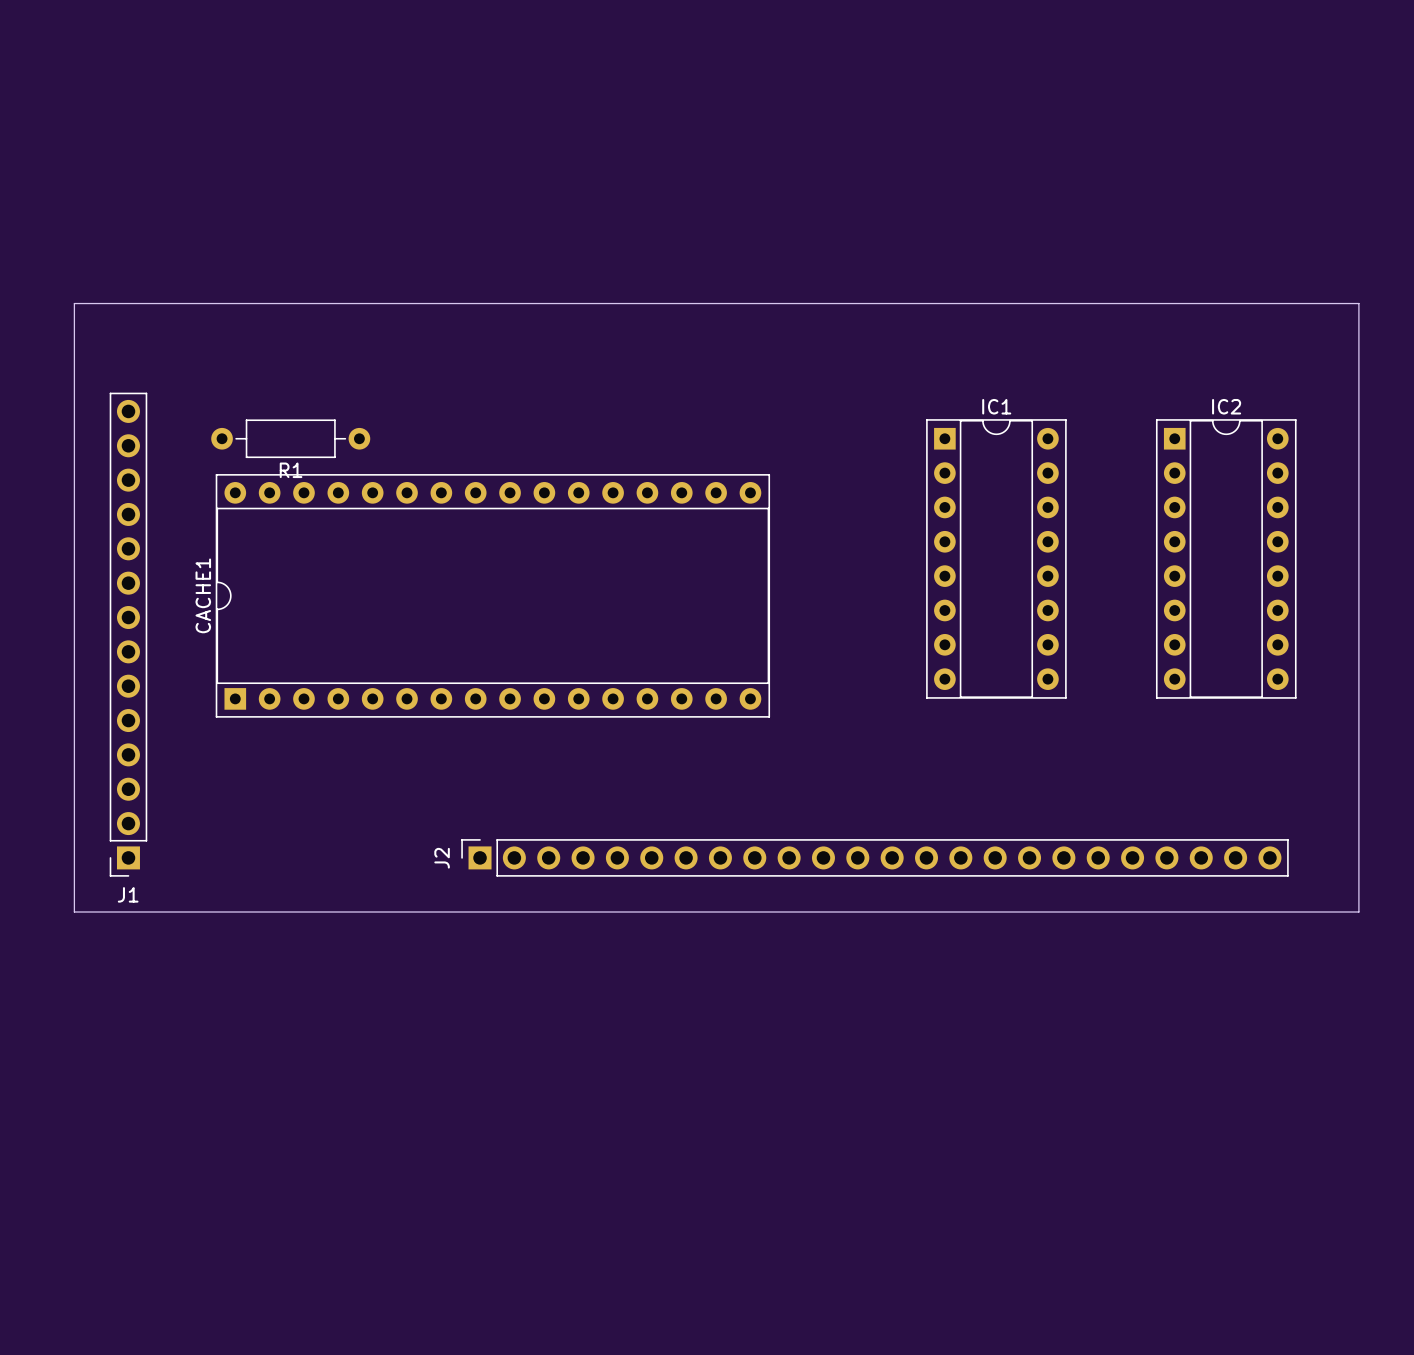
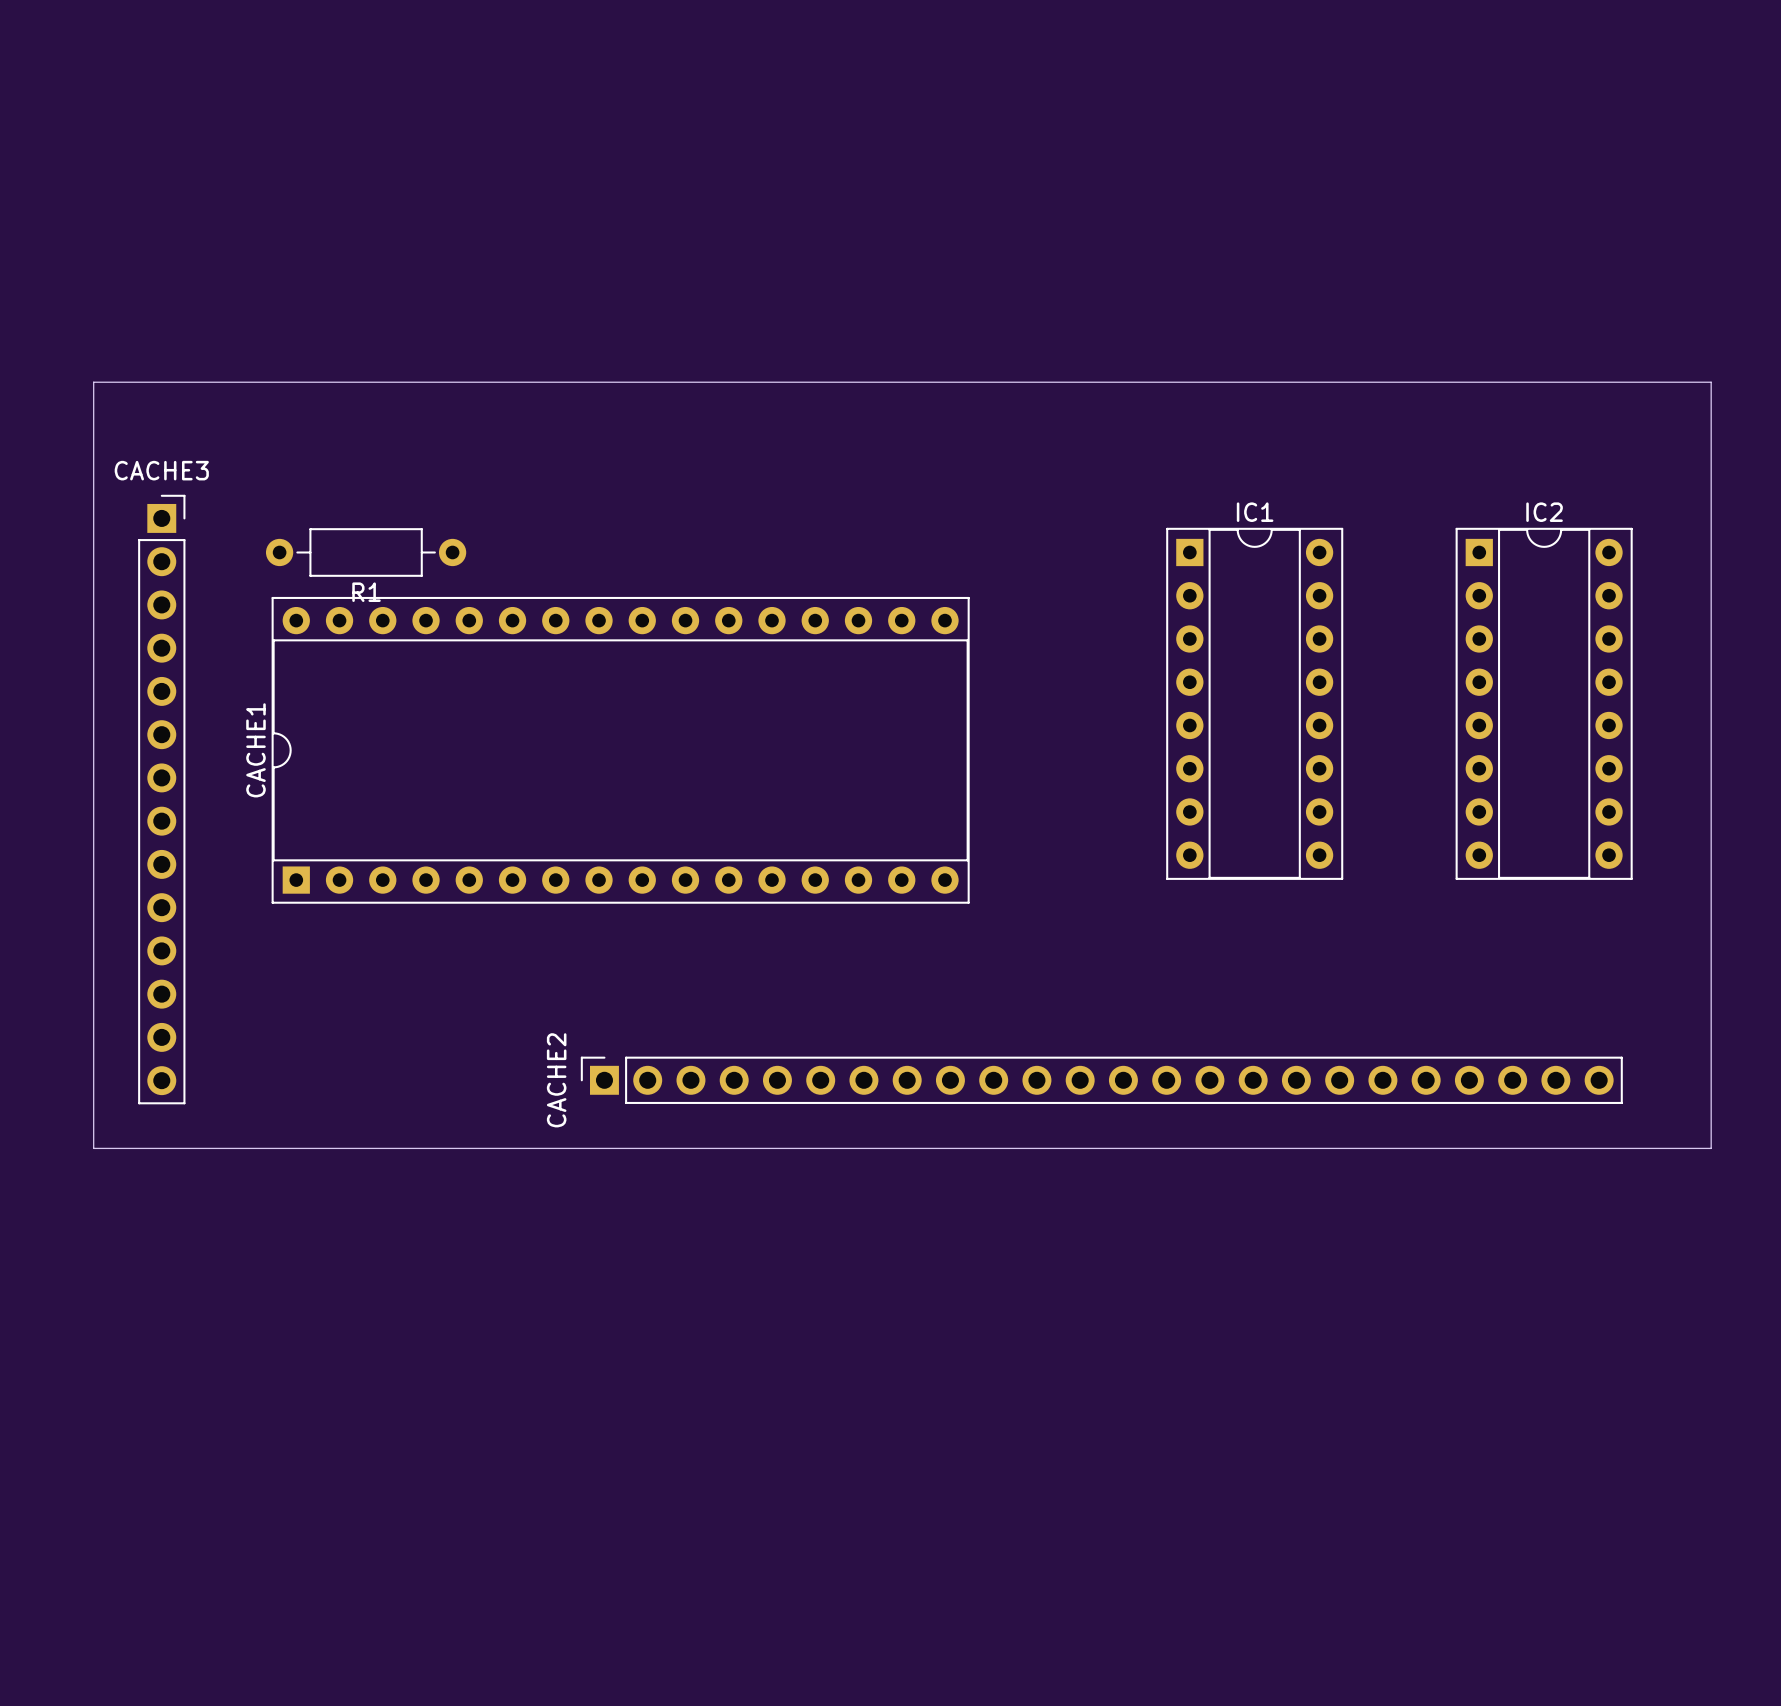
J1: (128, 634) -> none
CACHE3: none -> (161, 799)
J2 name: J2 (442, 858) -> CACHE2 (556, 1080)

